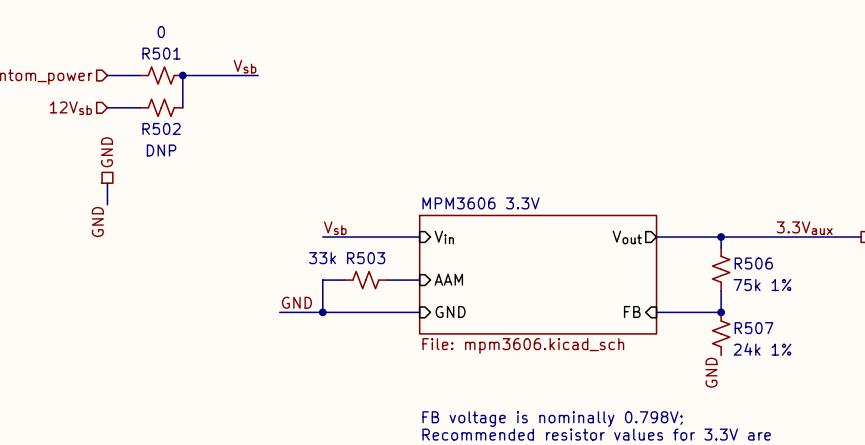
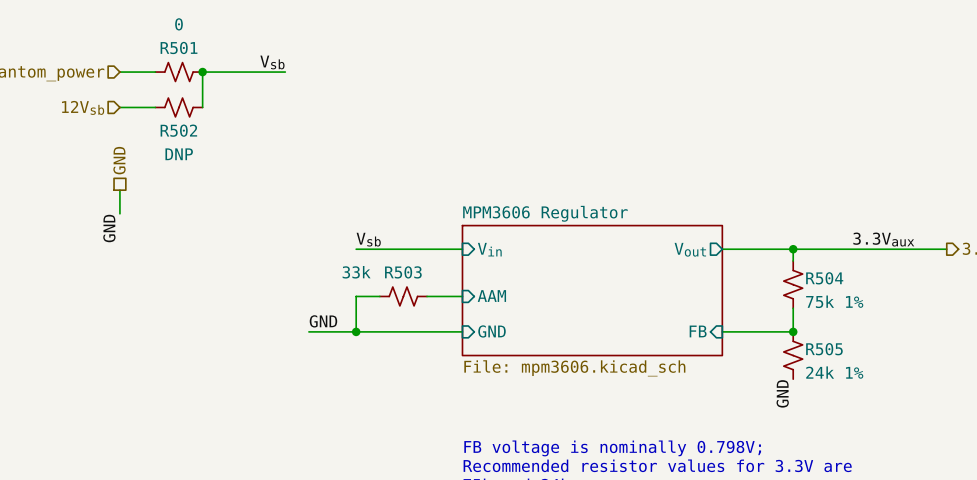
sheet MPM3606 3.3V name: MPM3606 3.3V (481, 203) -> MPM3606 Regulator (545, 213)
R506 name: R506 (753, 263) -> R504 (824, 278)
R507 name: R507 (754, 328) -> R505 (824, 349)

